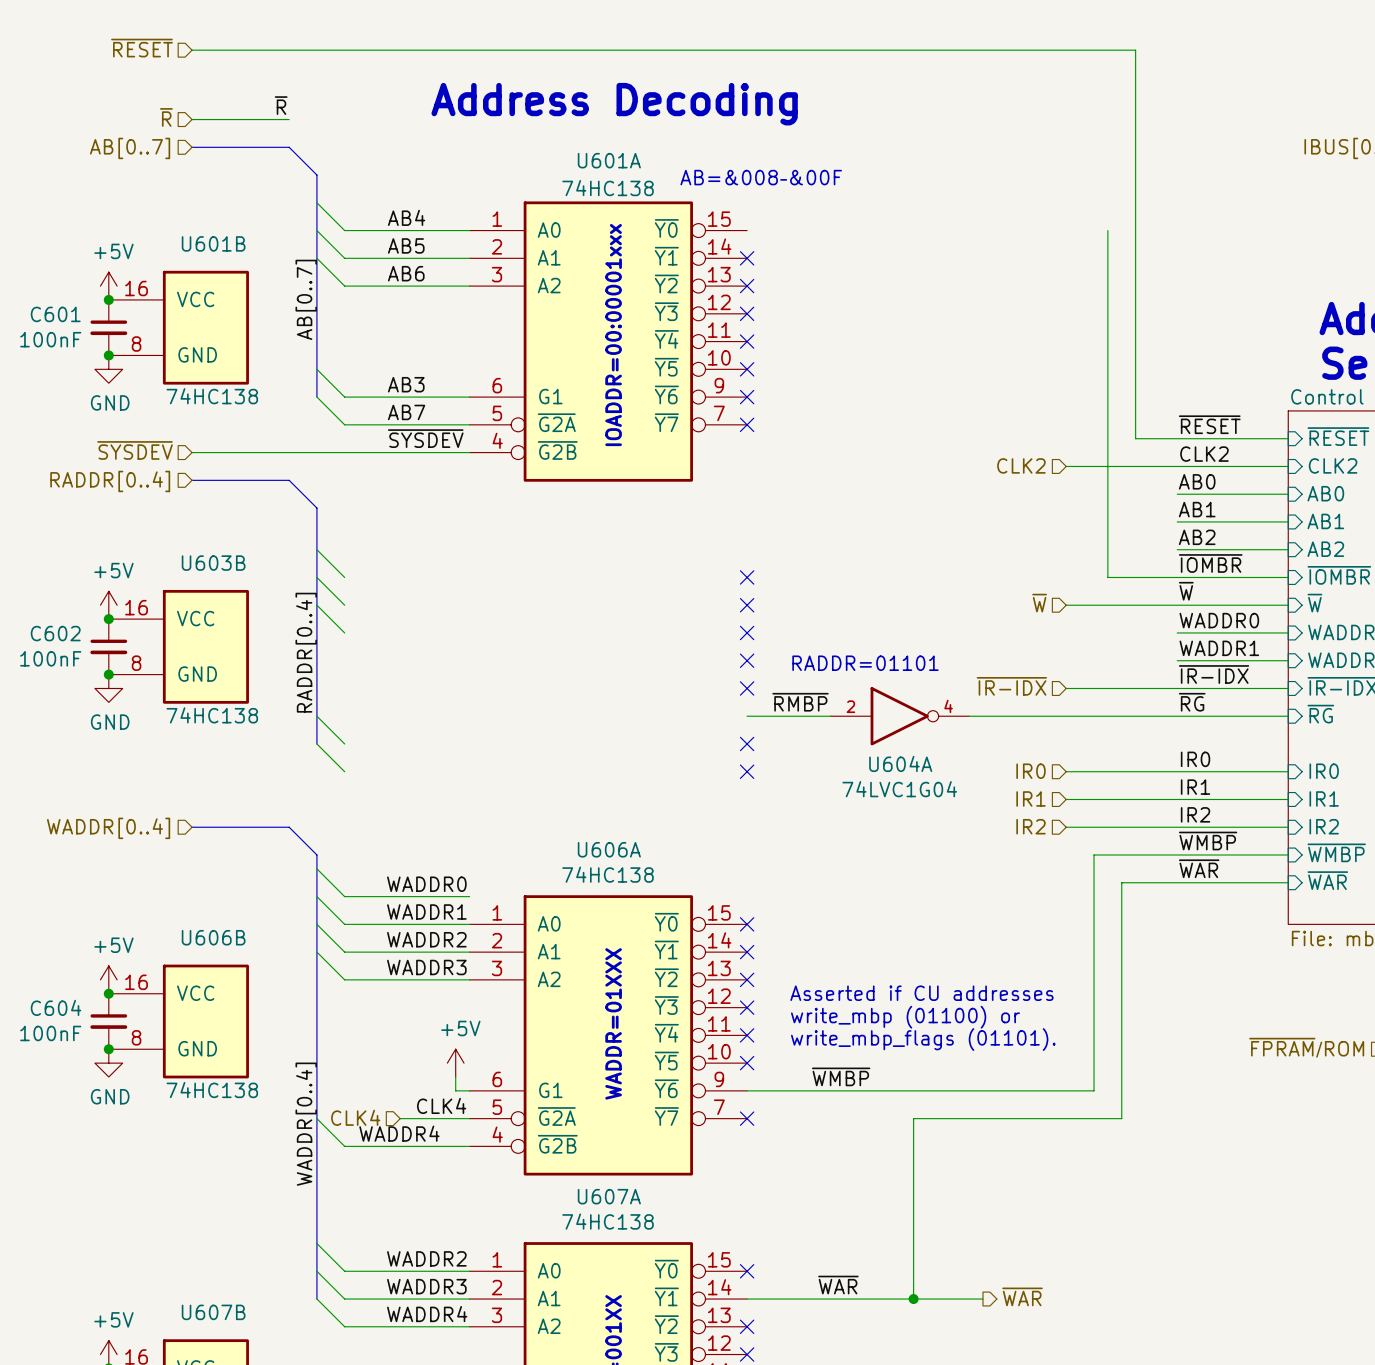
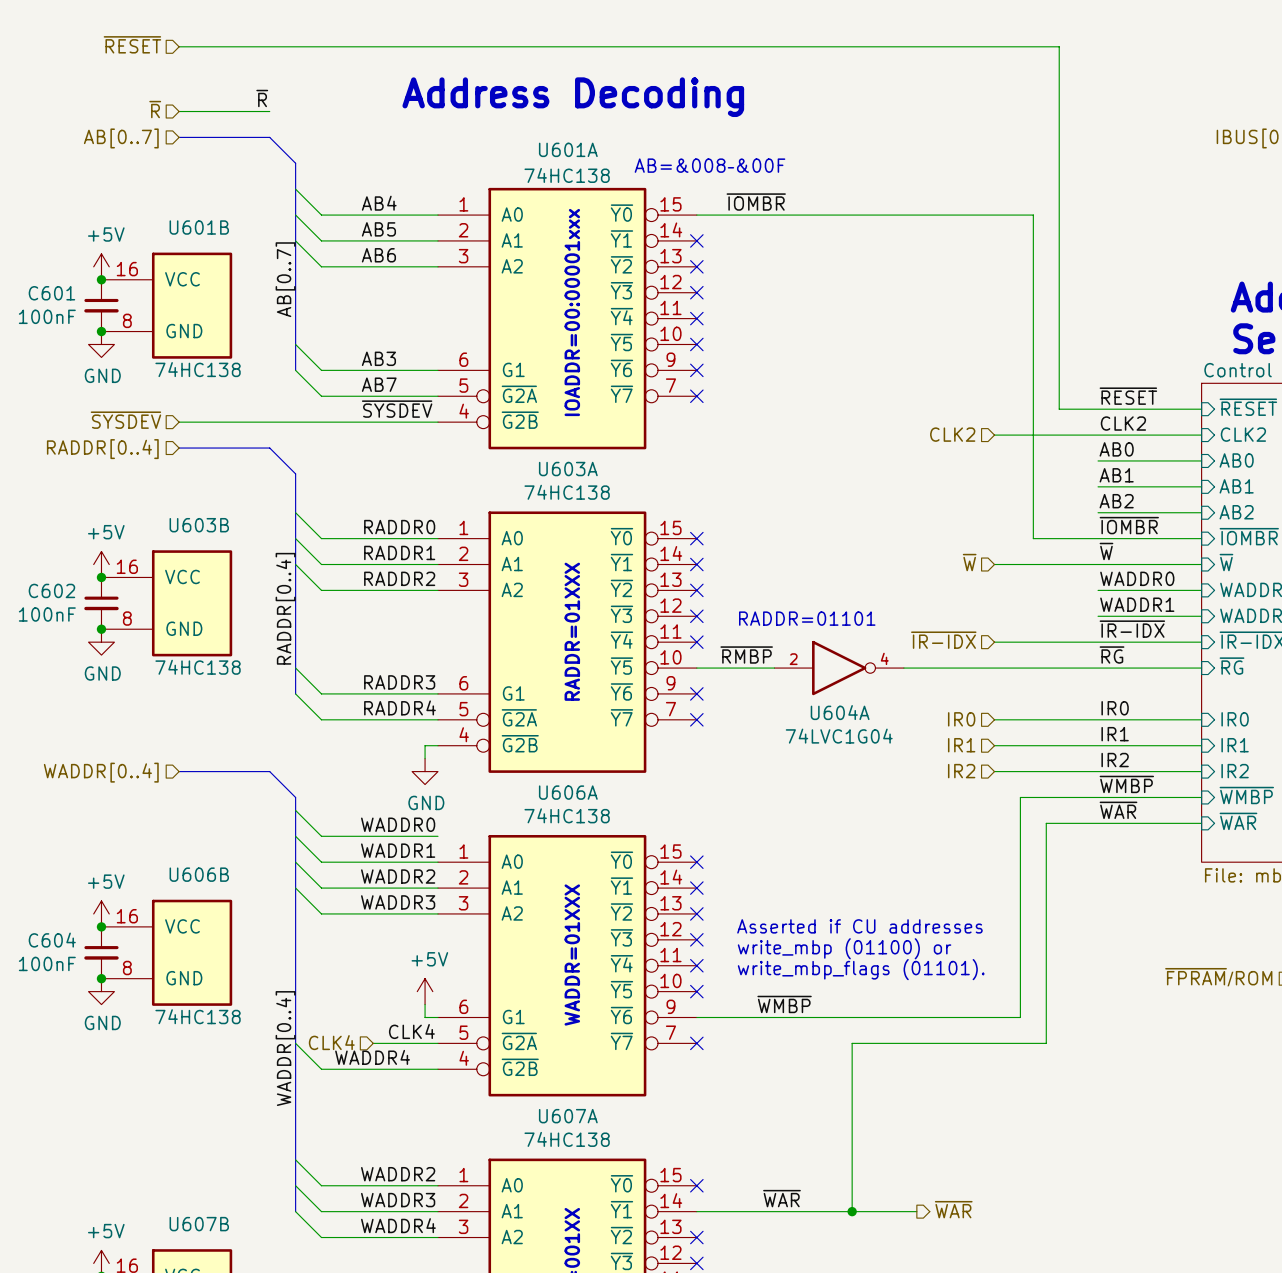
label: none -> ~{IOMBR} (756, 202)
wire: none -> (696, 215) (1033, 215)
label: none -> RADDR0 (399, 527)
wire: none -> (321, 538) (437, 538)
label: none -> RADDR1 (399, 552)
wire: none -> (321, 564) (437, 564)
label: none -> RADDR2 (399, 578)
wire: none -> (321, 590) (437, 590)
text: none -> RADDR=01XXX (572, 631)
U603A: none -> 74HC138 (567, 642)
label: none -> RADDR3 (399, 682)
wire: none -> (321, 693) (437, 693)
label: none -> RADDR4 (399, 707)
wire: none -> (321, 719) (437, 719)
wire: none -> (437, 745) (425, 745) (425, 758)
power symbol: none -> GND (425, 771)

